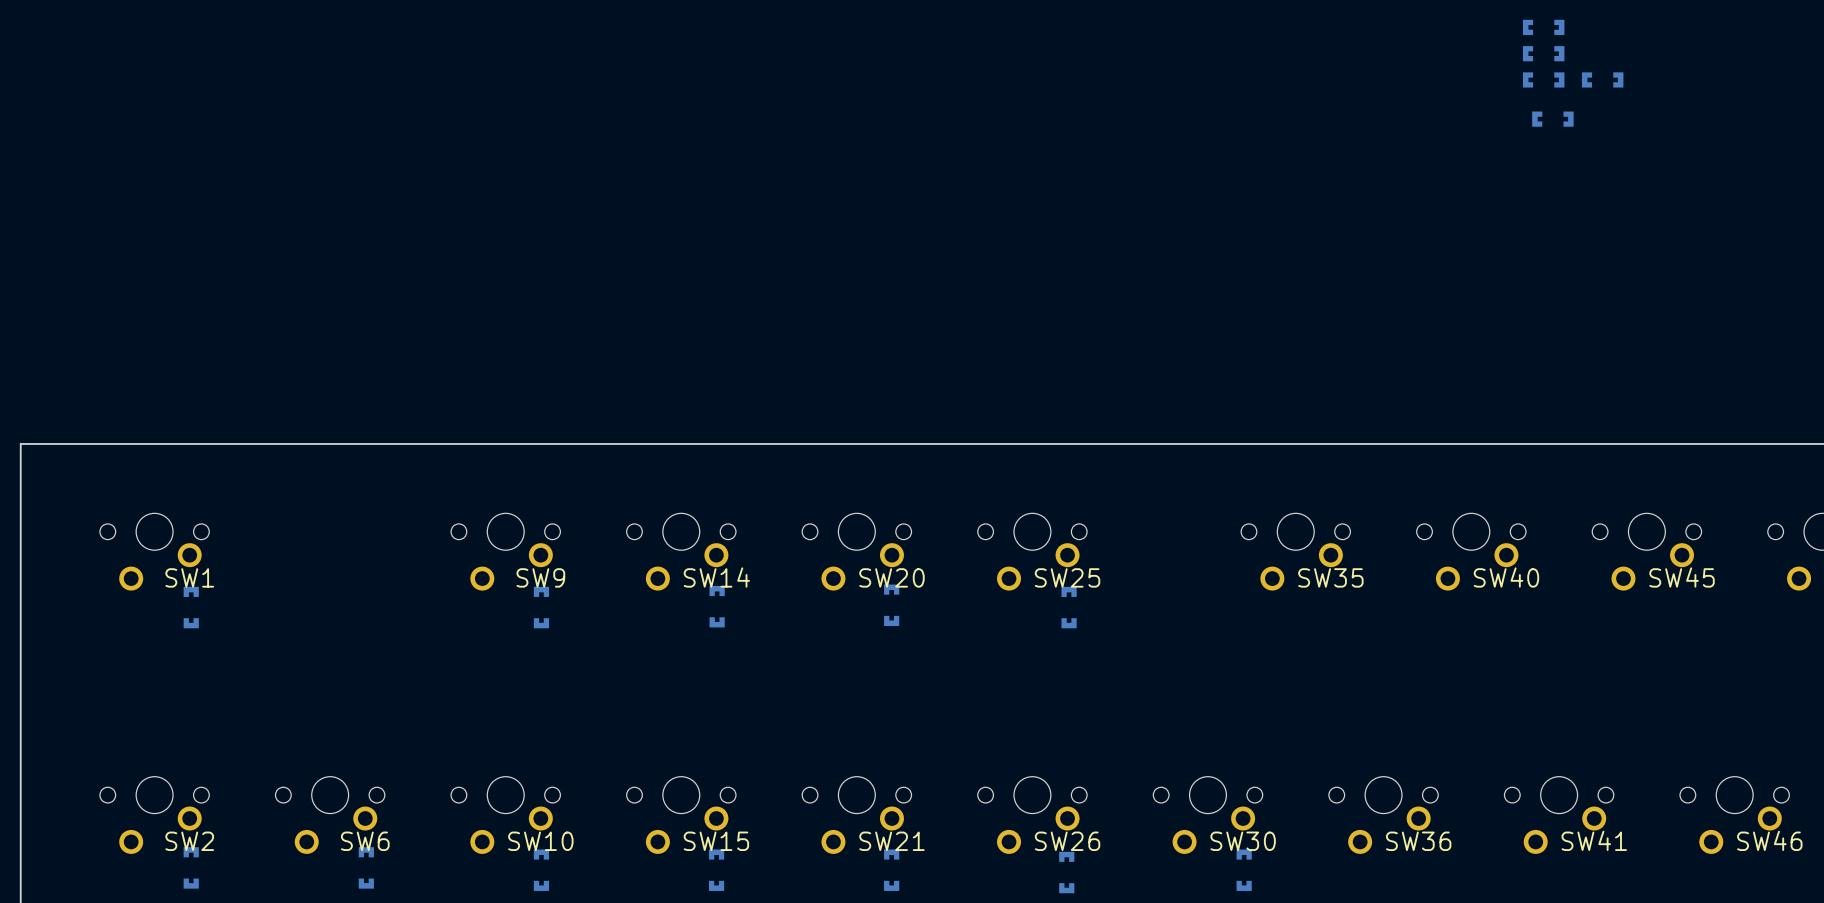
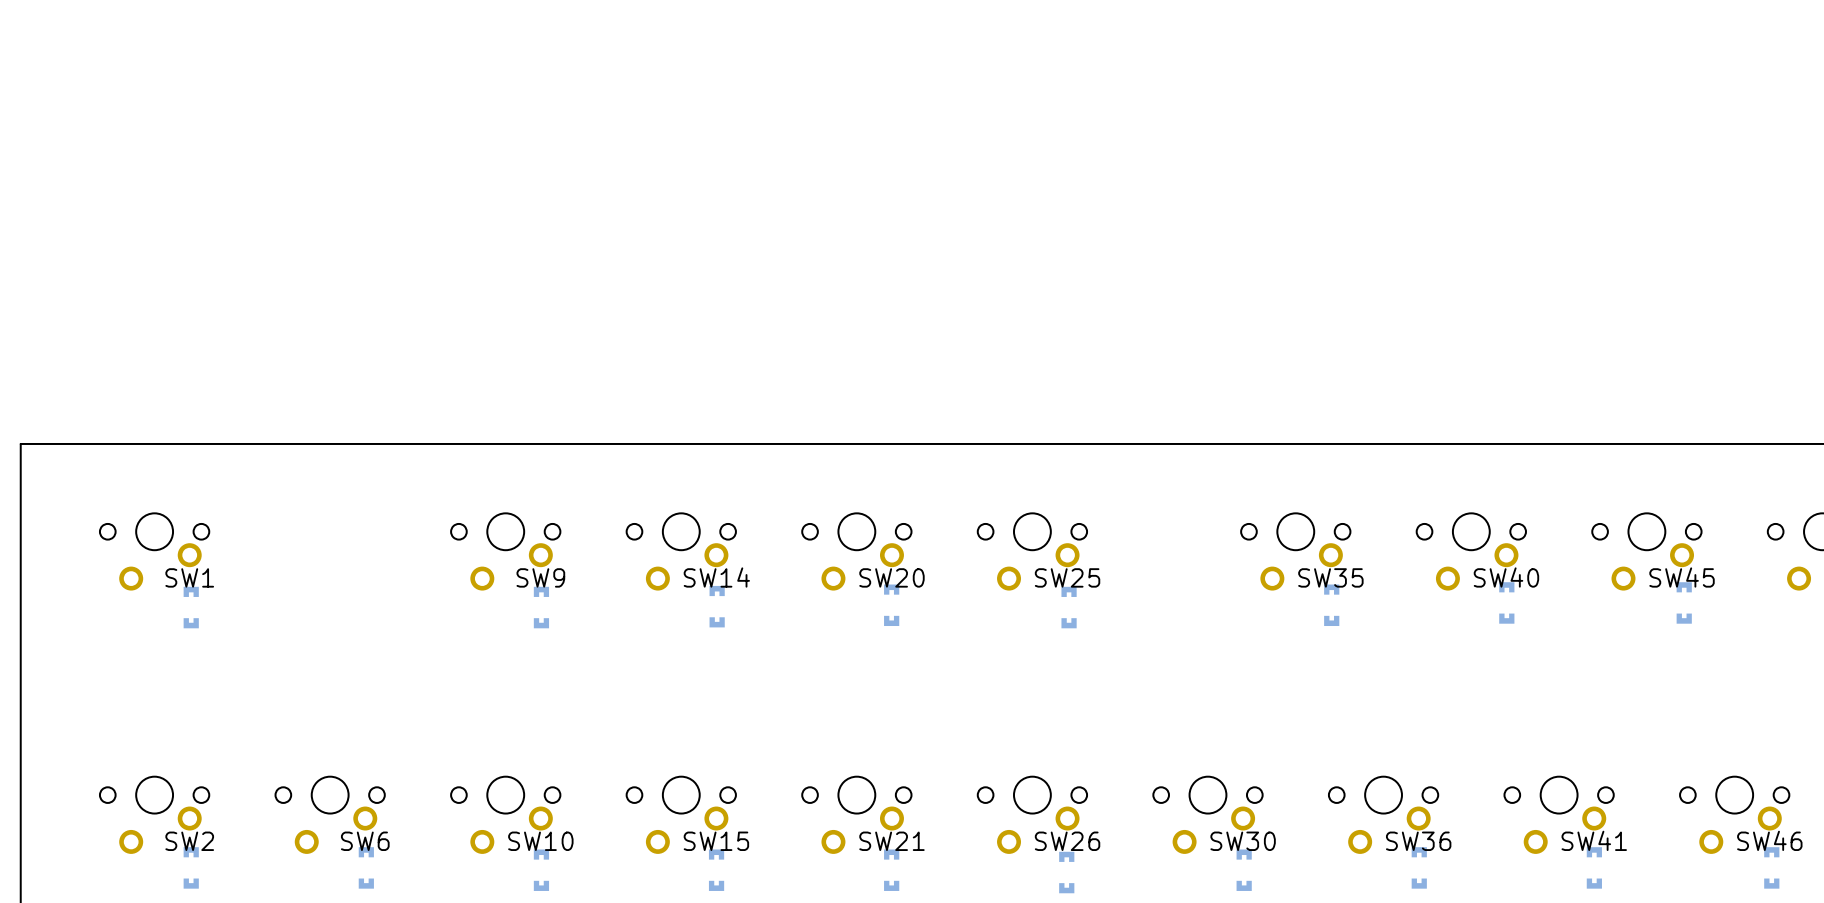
part: (1543, 27) -> none
part: (1543, 53) -> none
part: (1543, 79) -> none
part: (1602, 79) -> none
part: (1552, 119) -> none
part: none -> (1506, 602)
part: none -> (1684, 602)
part: none -> (1331, 605)
part: none -> (1419, 867)
part: none -> (1594, 867)
part: none -> (1771, 867)

